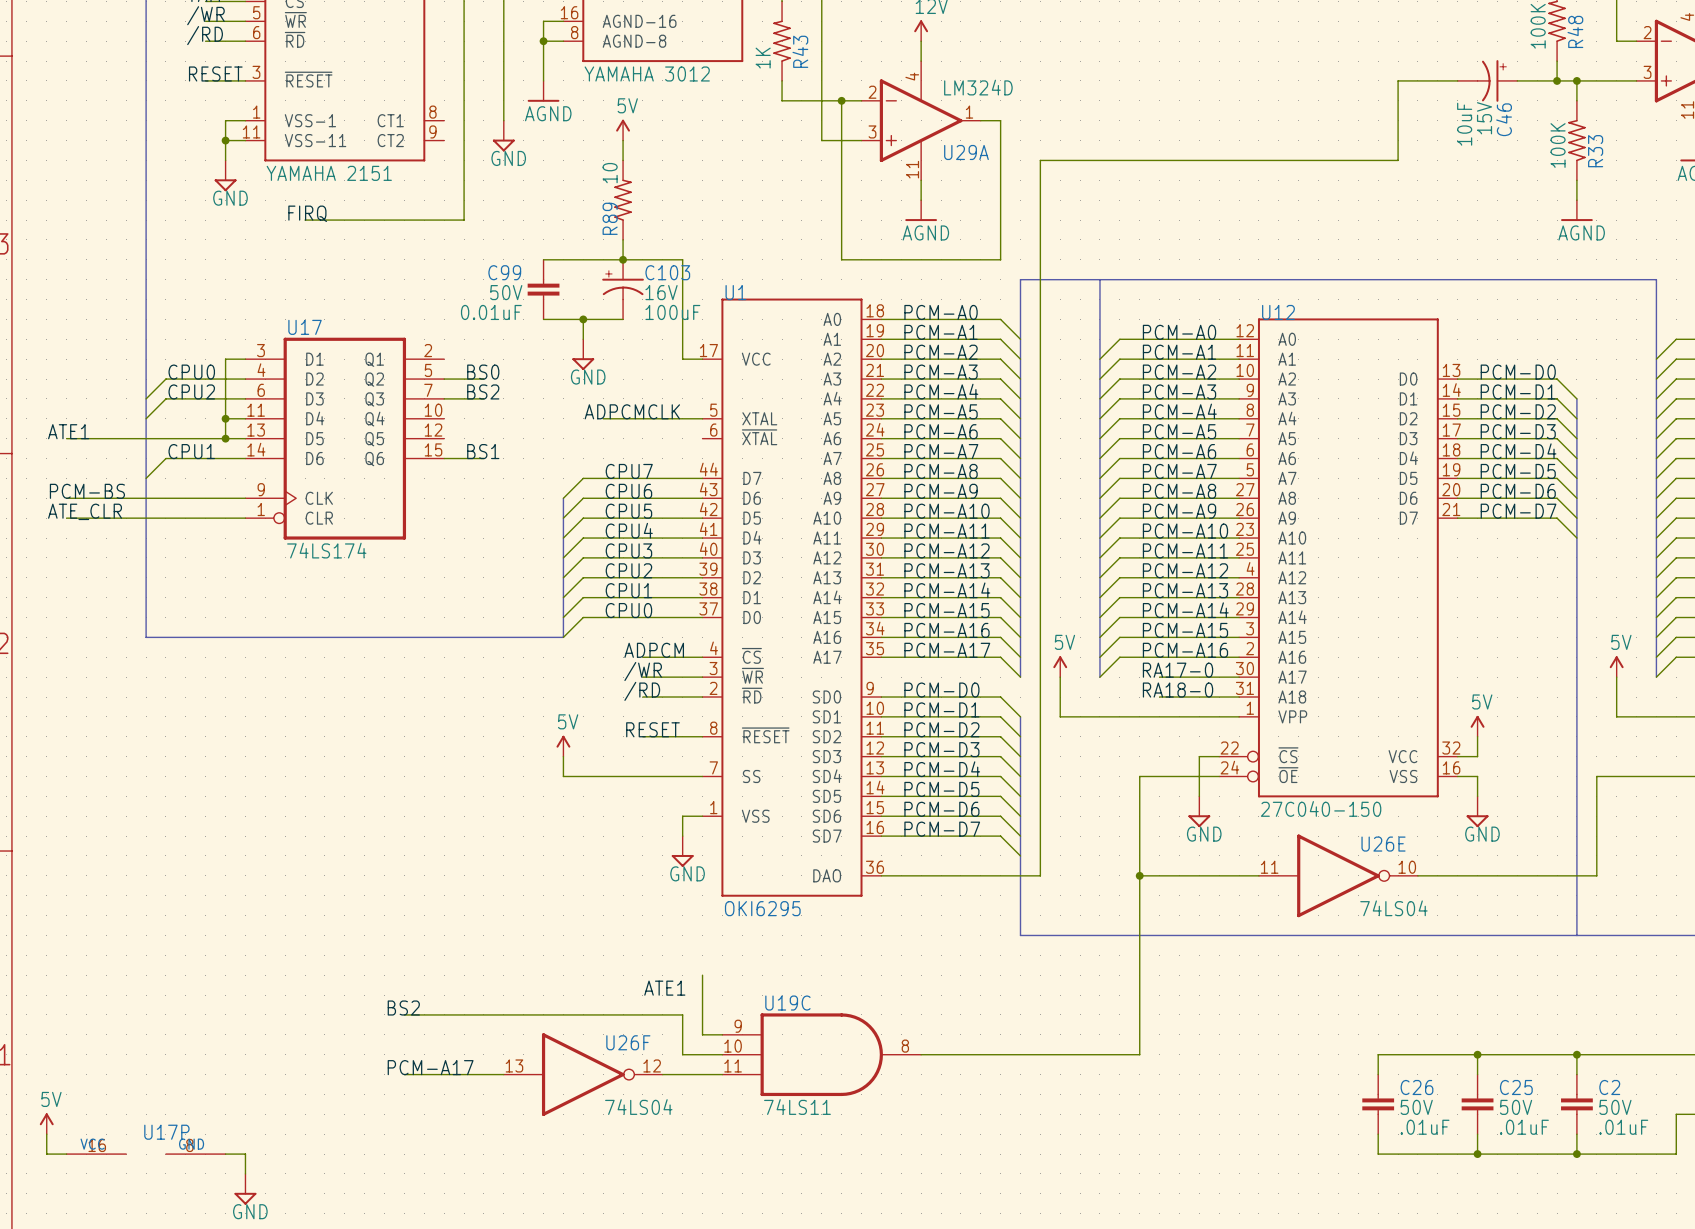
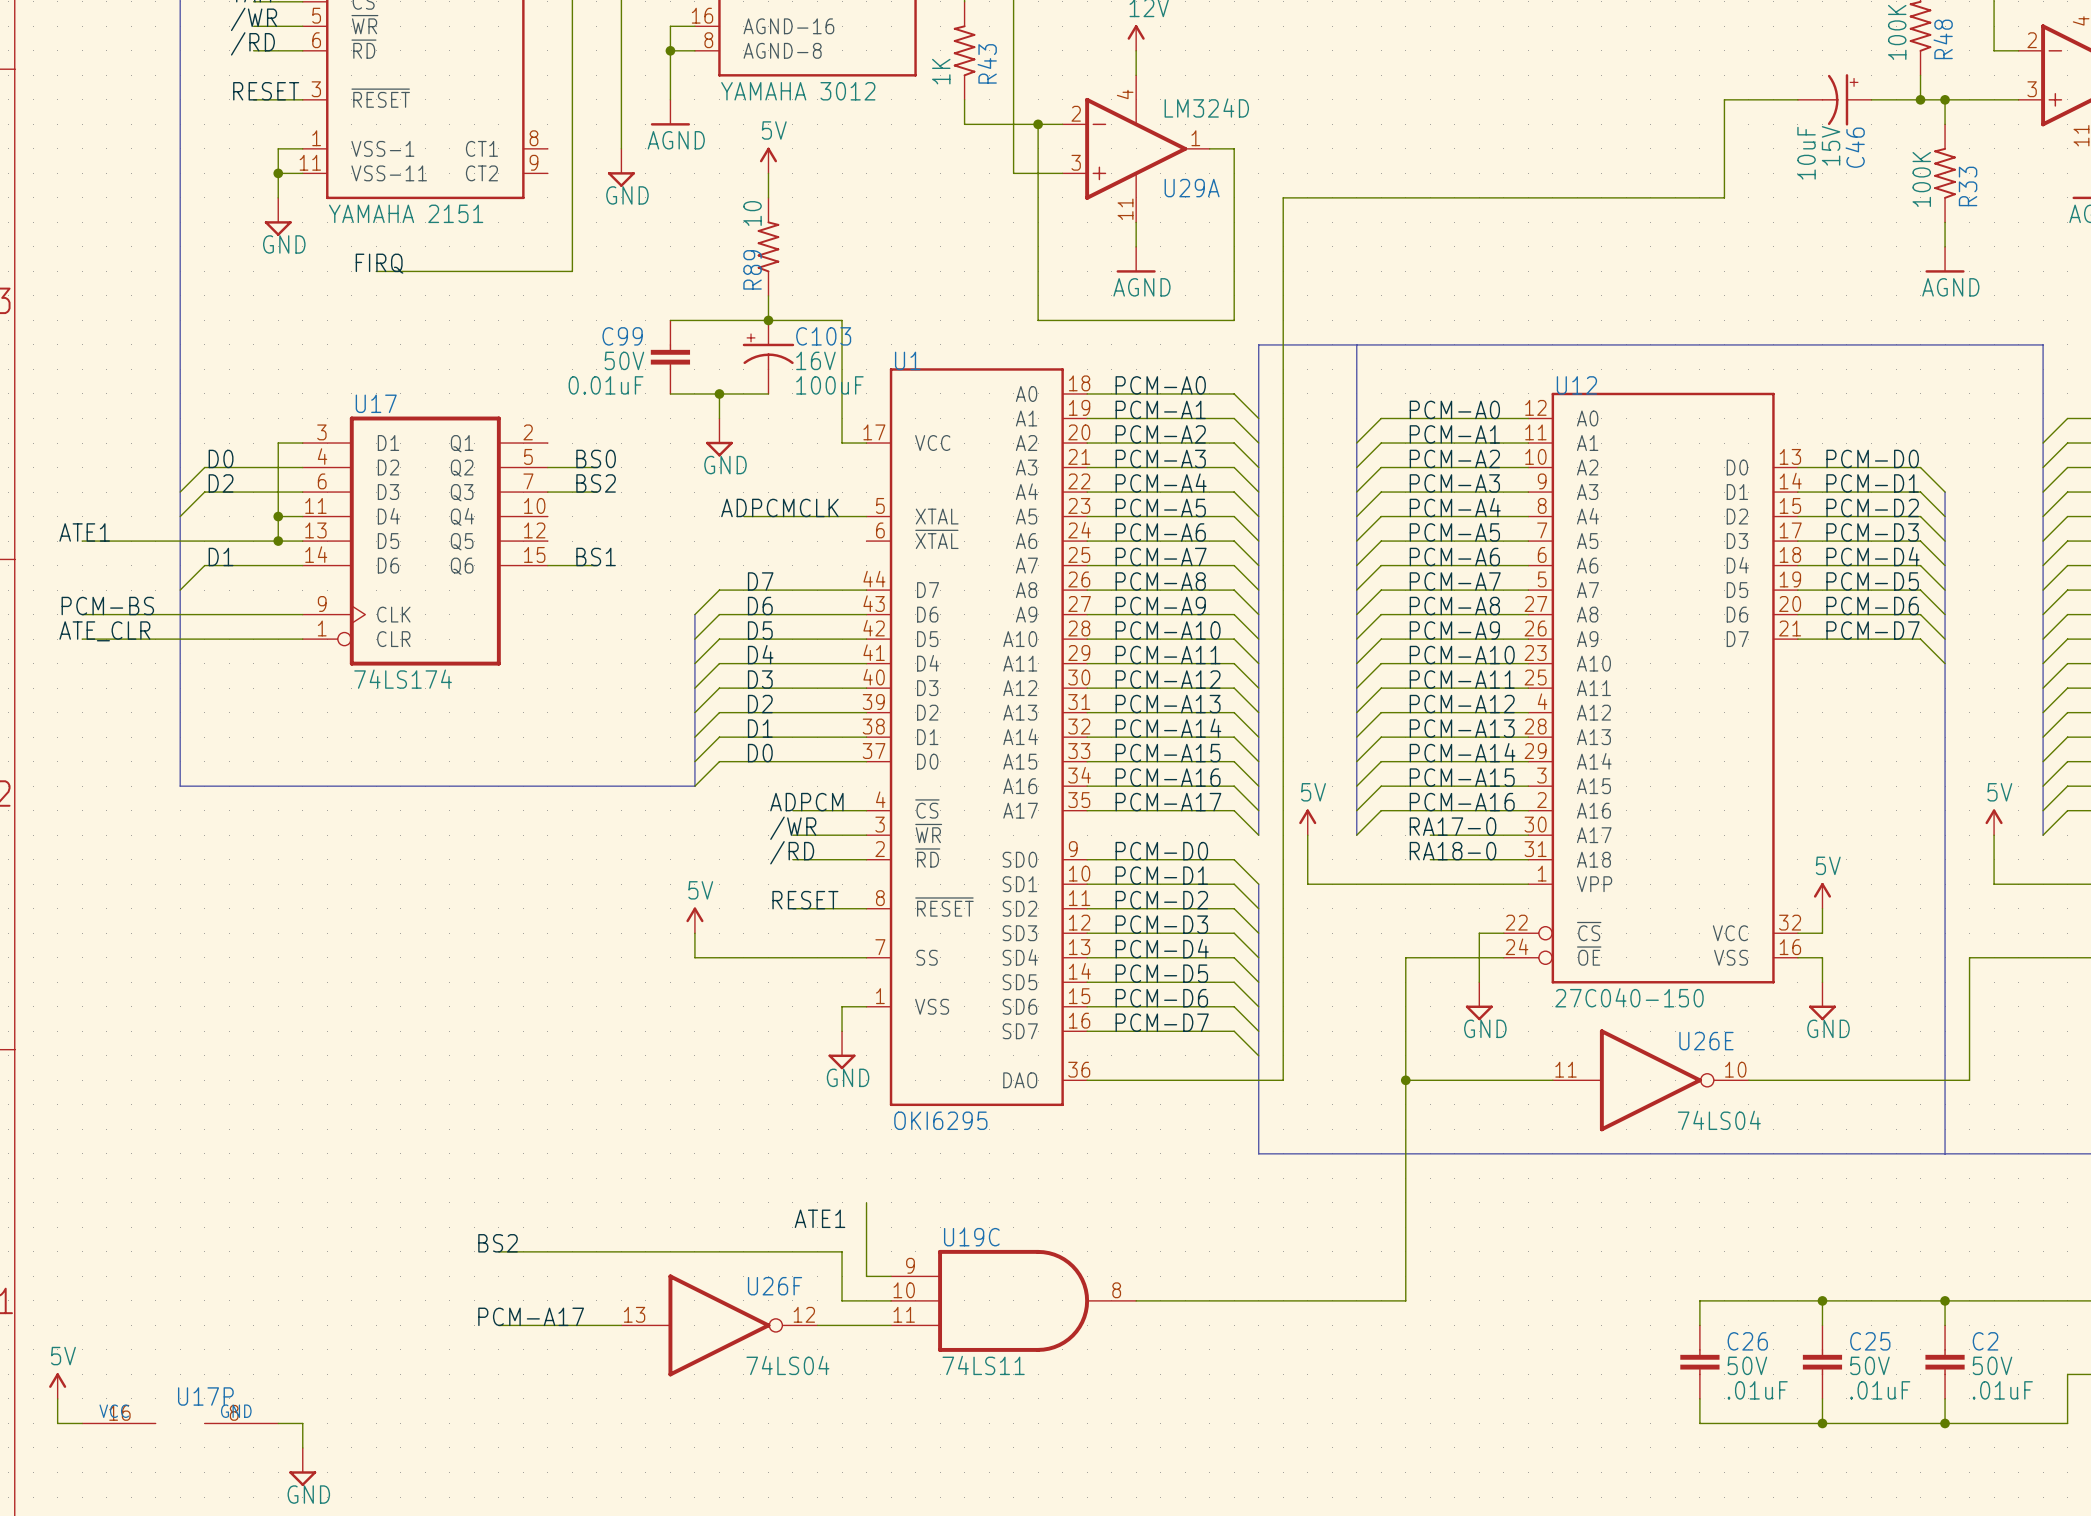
label: CPU0 (191, 372) -> D0 (221, 458)
label: CPU2 (191, 391) -> D2 (221, 483)
label: CPU1 (191, 451) -> D1 (221, 556)
label: CPU7 (629, 471) -> D7 (760, 581)
label: CPU6 (628, 491) -> D6 (760, 606)
label: CPU5 (628, 511) -> D5 (760, 630)
label: CPU4 (629, 530) -> D4 (760, 654)
label: CPU3 (628, 550) -> D3 (760, 679)
label: CPU2 (628, 570) -> D2 (760, 704)
label: CPU1 (628, 590) -> D1 (760, 728)
label: CPU0 (628, 610) -> D0 (760, 753)

